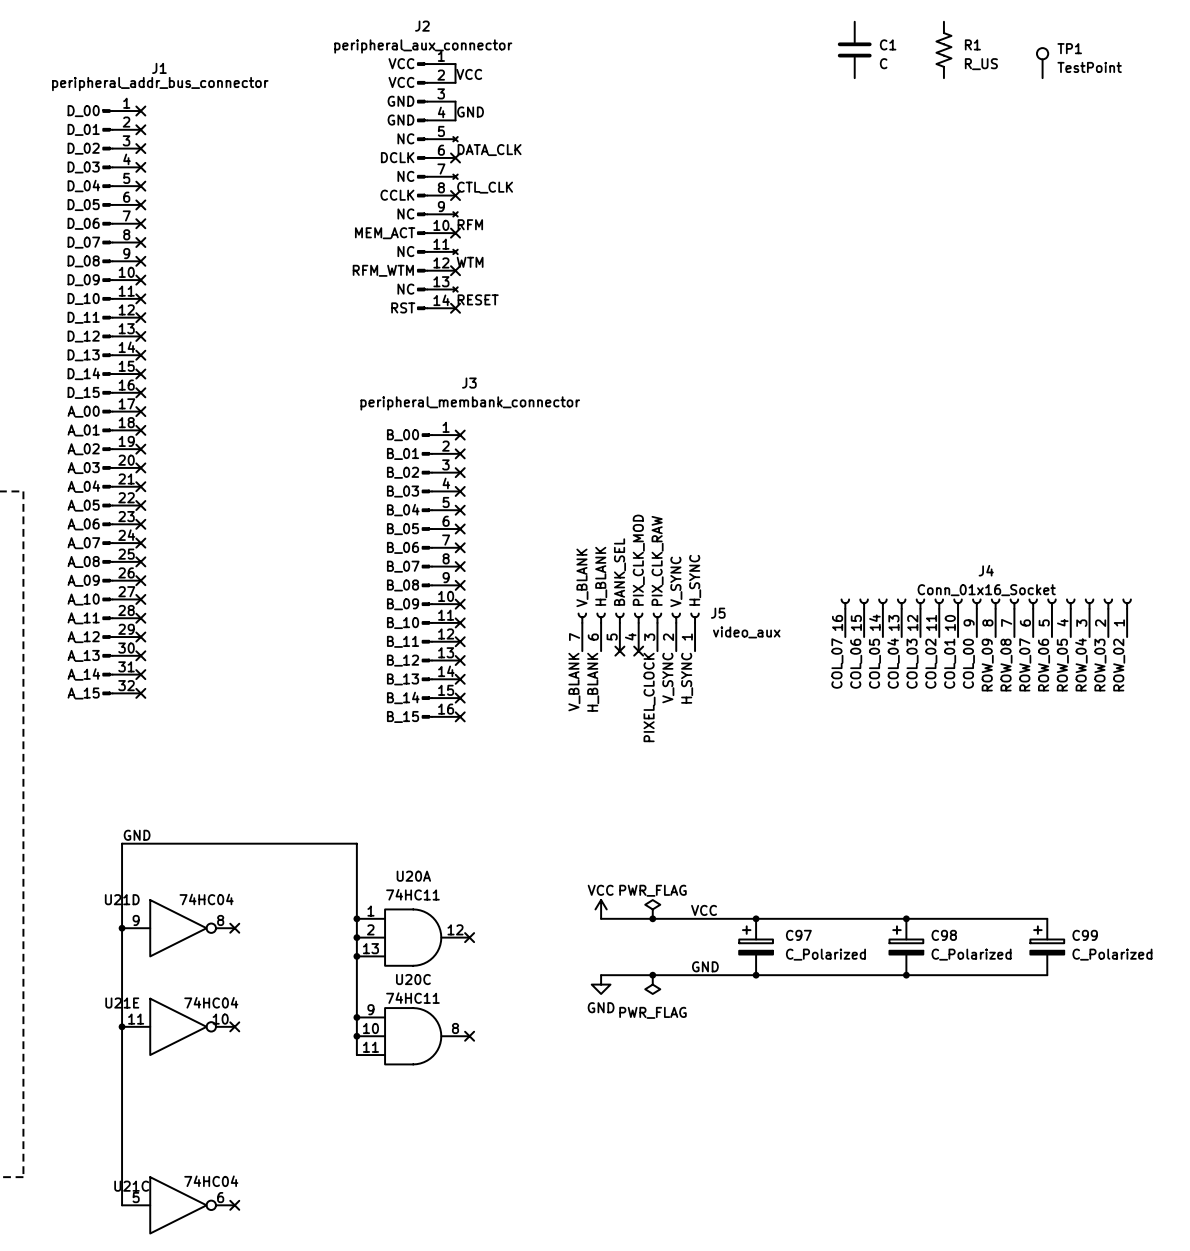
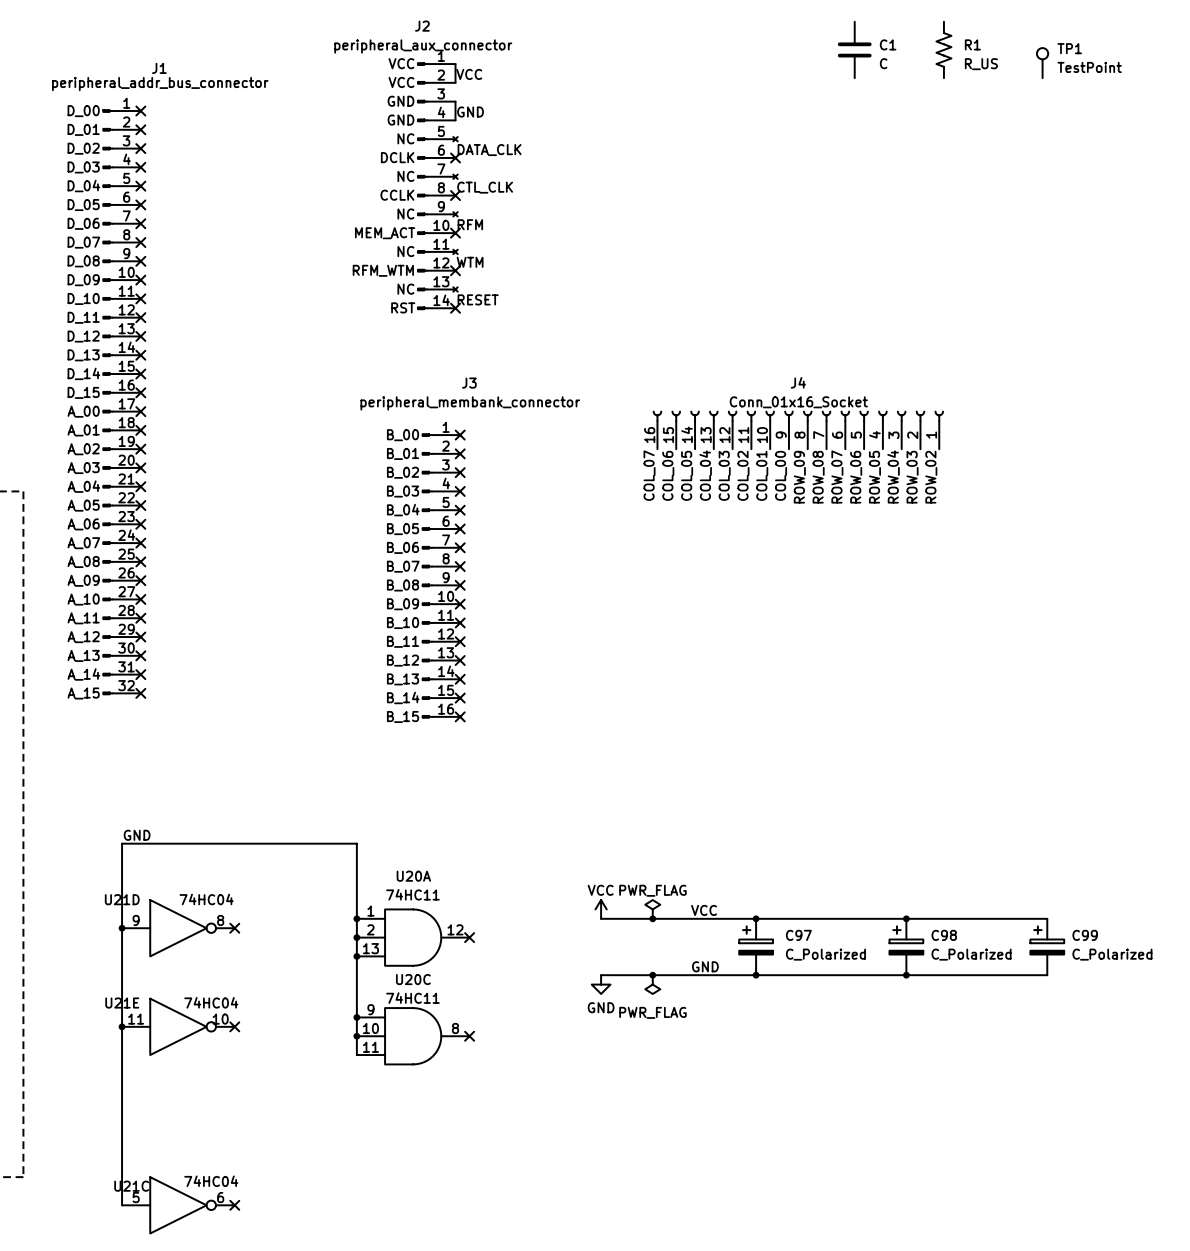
label: none -> COL_07 (649, 475)
label: none -> COL_06 (668, 475)
label: none -> COL_05 (687, 475)
label: none -> COL_04 (705, 475)
label: none -> COL_03 (724, 475)
label: none -> COL_02 (743, 475)
label: none -> COL_01 (762, 475)
label: none -> COL_00 (781, 475)
label: none -> ROW_07 (837, 476)
label: none -> ROW_04 (893, 476)
label: none -> ROW_09 (799, 477)
label: none -> ROW_08 (818, 477)
label: none -> ROW_06 (856, 477)
label: none -> ROW_05 (874, 477)
label: none -> ROW_03 (912, 477)
label: none -> ROW_02 (931, 477)
J4 position: (986, 617) -> (798, 430)
J5: video_aux (638, 632) -> none
no-connect mark: (619, 651) -> none
no-connect mark: (638, 651) -> none
label: COL_07 (837, 663) -> none
label: COL_06 (856, 663) -> none
label: COL_05 (874, 663) -> none
label: COL_04 (893, 663) -> none
label: COL_03 (912, 663) -> none
label: COL_02 (931, 663) -> none
label: COL_01 (950, 663) -> none
label: COL_00 (968, 663) -> none
label: ROW_07 (1025, 664) -> none
label: ROW_04 (1081, 664) -> none
label: ROW_09 (987, 665) -> none
label: ROW_08 (1006, 665) -> none
label: ROW_06 (1044, 665) -> none
label: ROW_05 (1062, 665) -> none
label: ROW_03 (1100, 665) -> none
label: ROW_02 (1119, 665) -> none
label: V_SYNC (668, 678) -> none
label: H_SYNC (687, 678) -> none
label: V_BLANK (574, 682) -> none
label: H_BLANK (593, 682) -> none
label: PIXEL_CLOCK (649, 697) -> none

